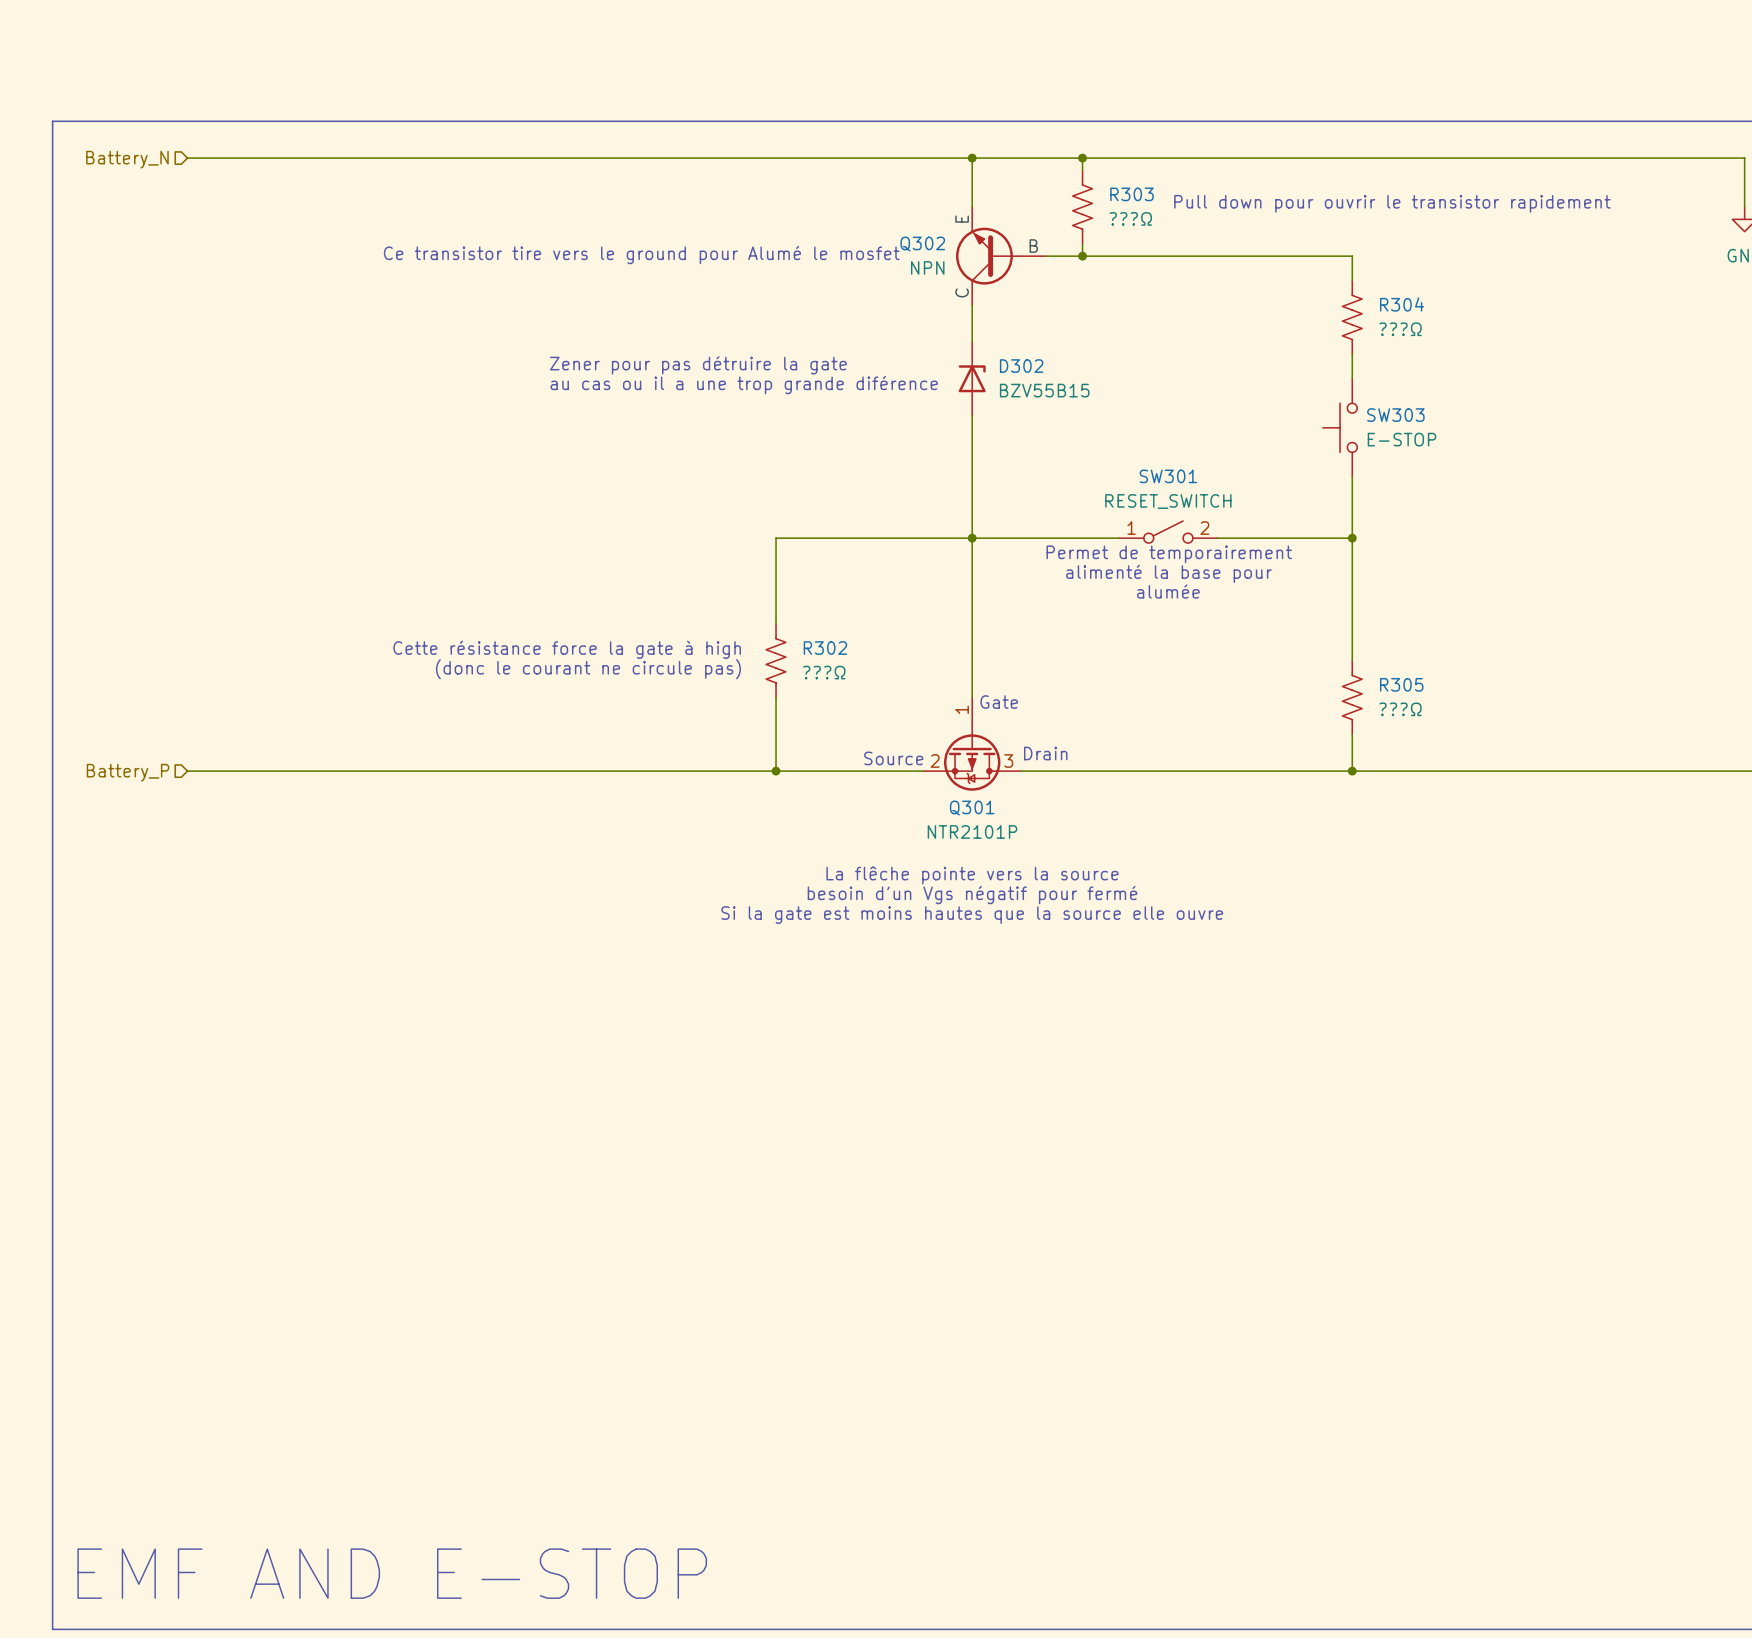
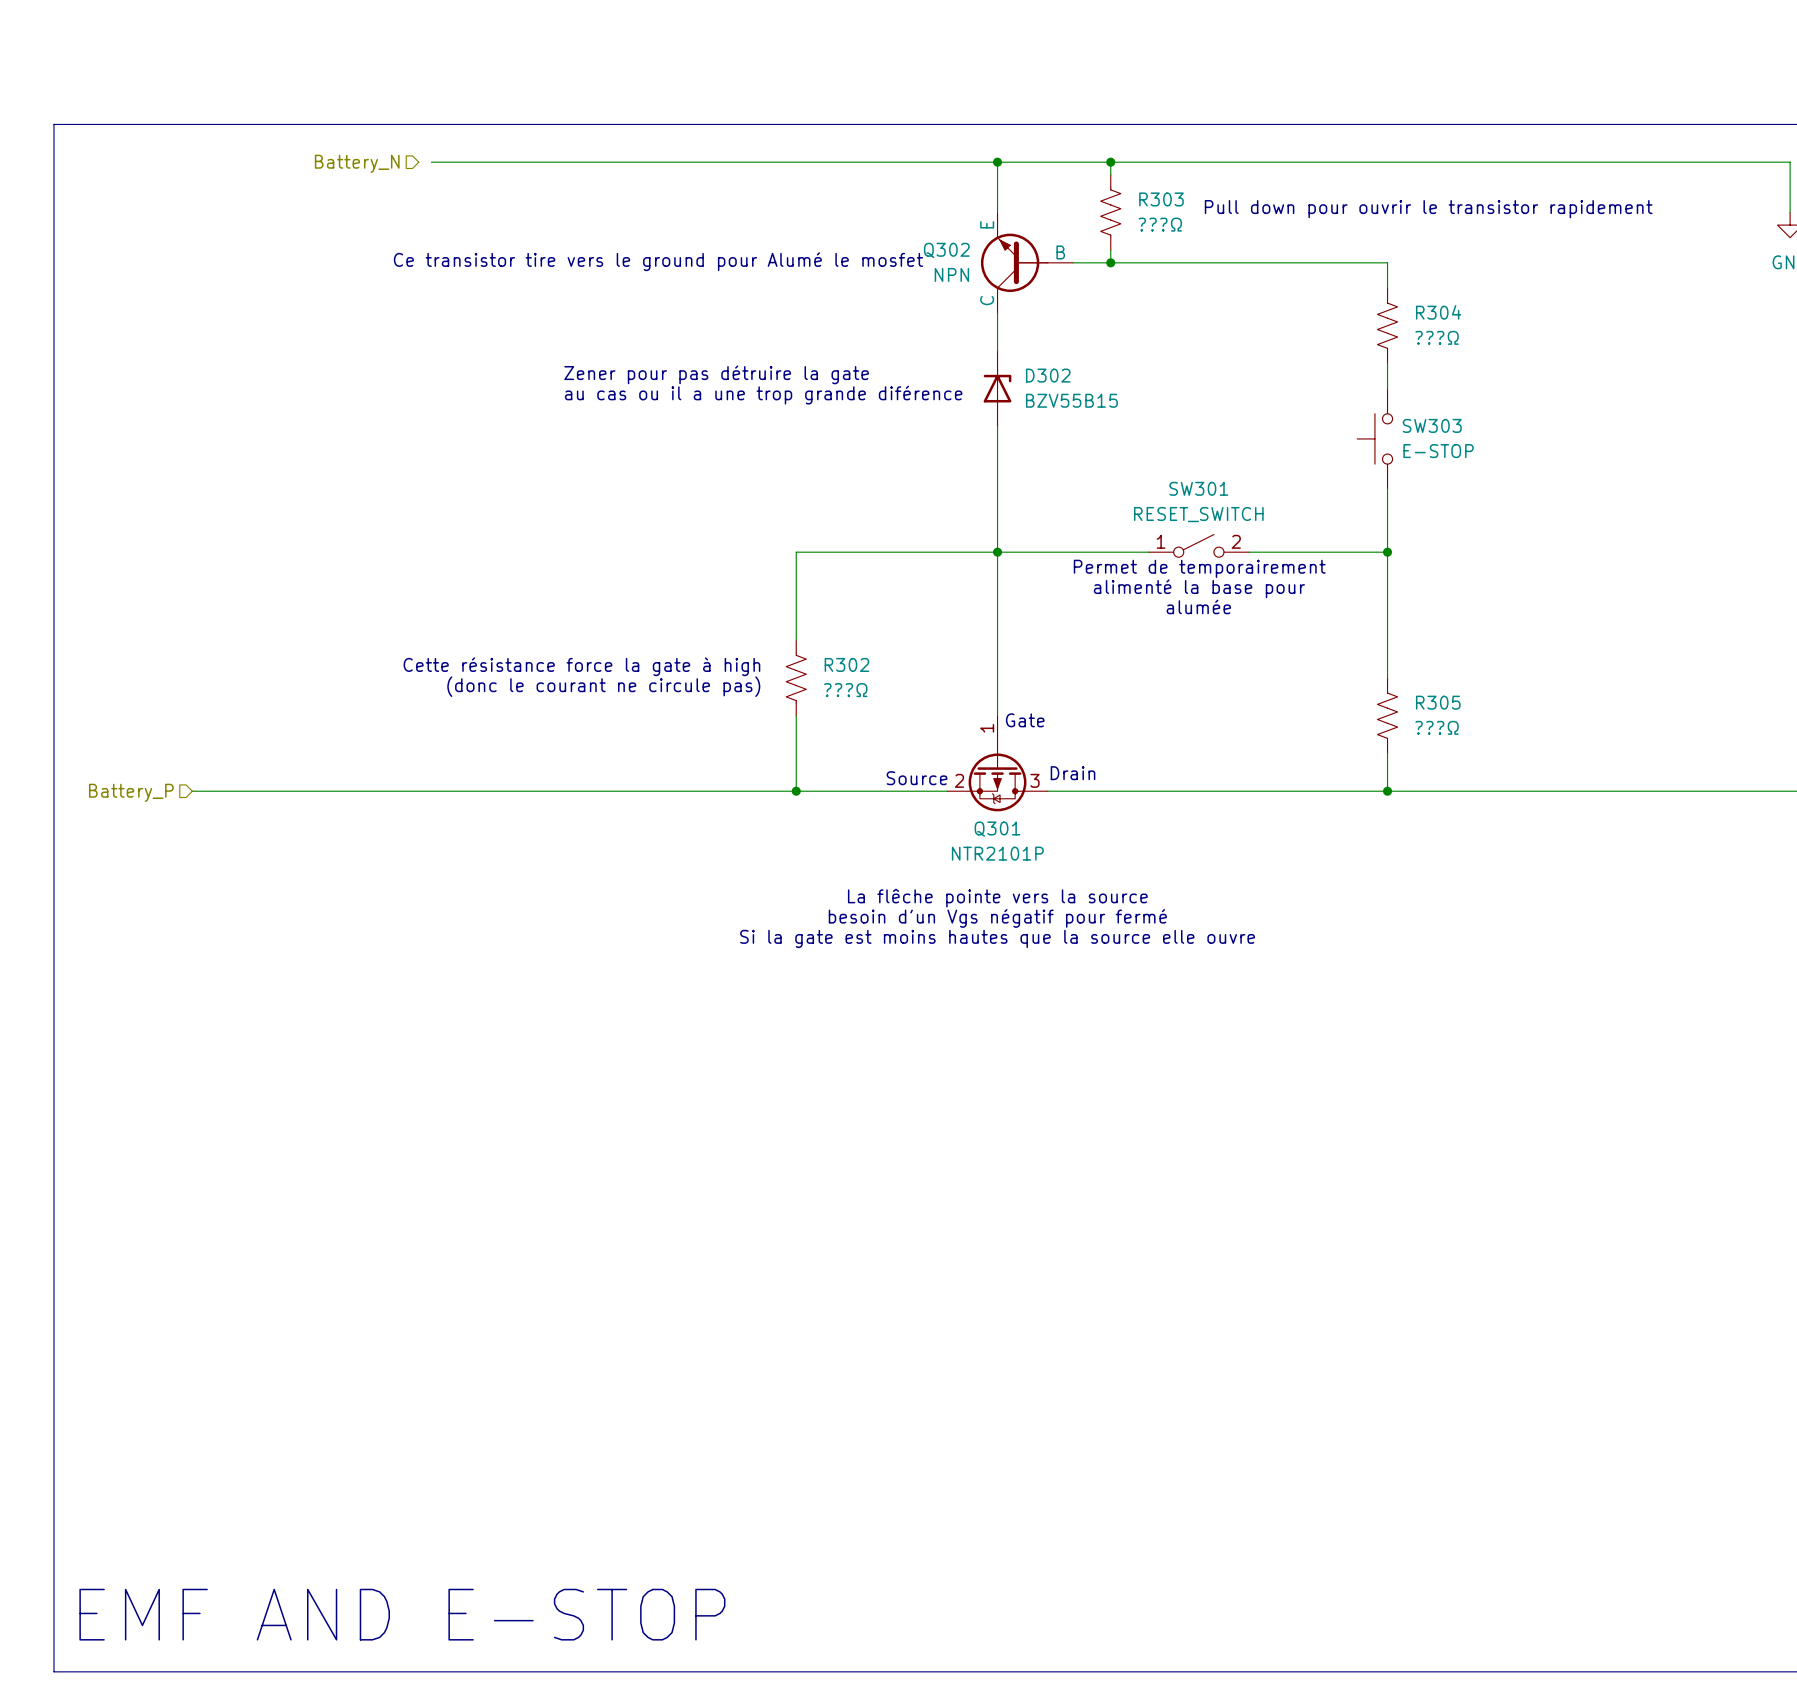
wire: (187, 158) (420, 158) -> none
hierarchical label position: Battery_N (127, 159) -> Battery_N (357, 163)

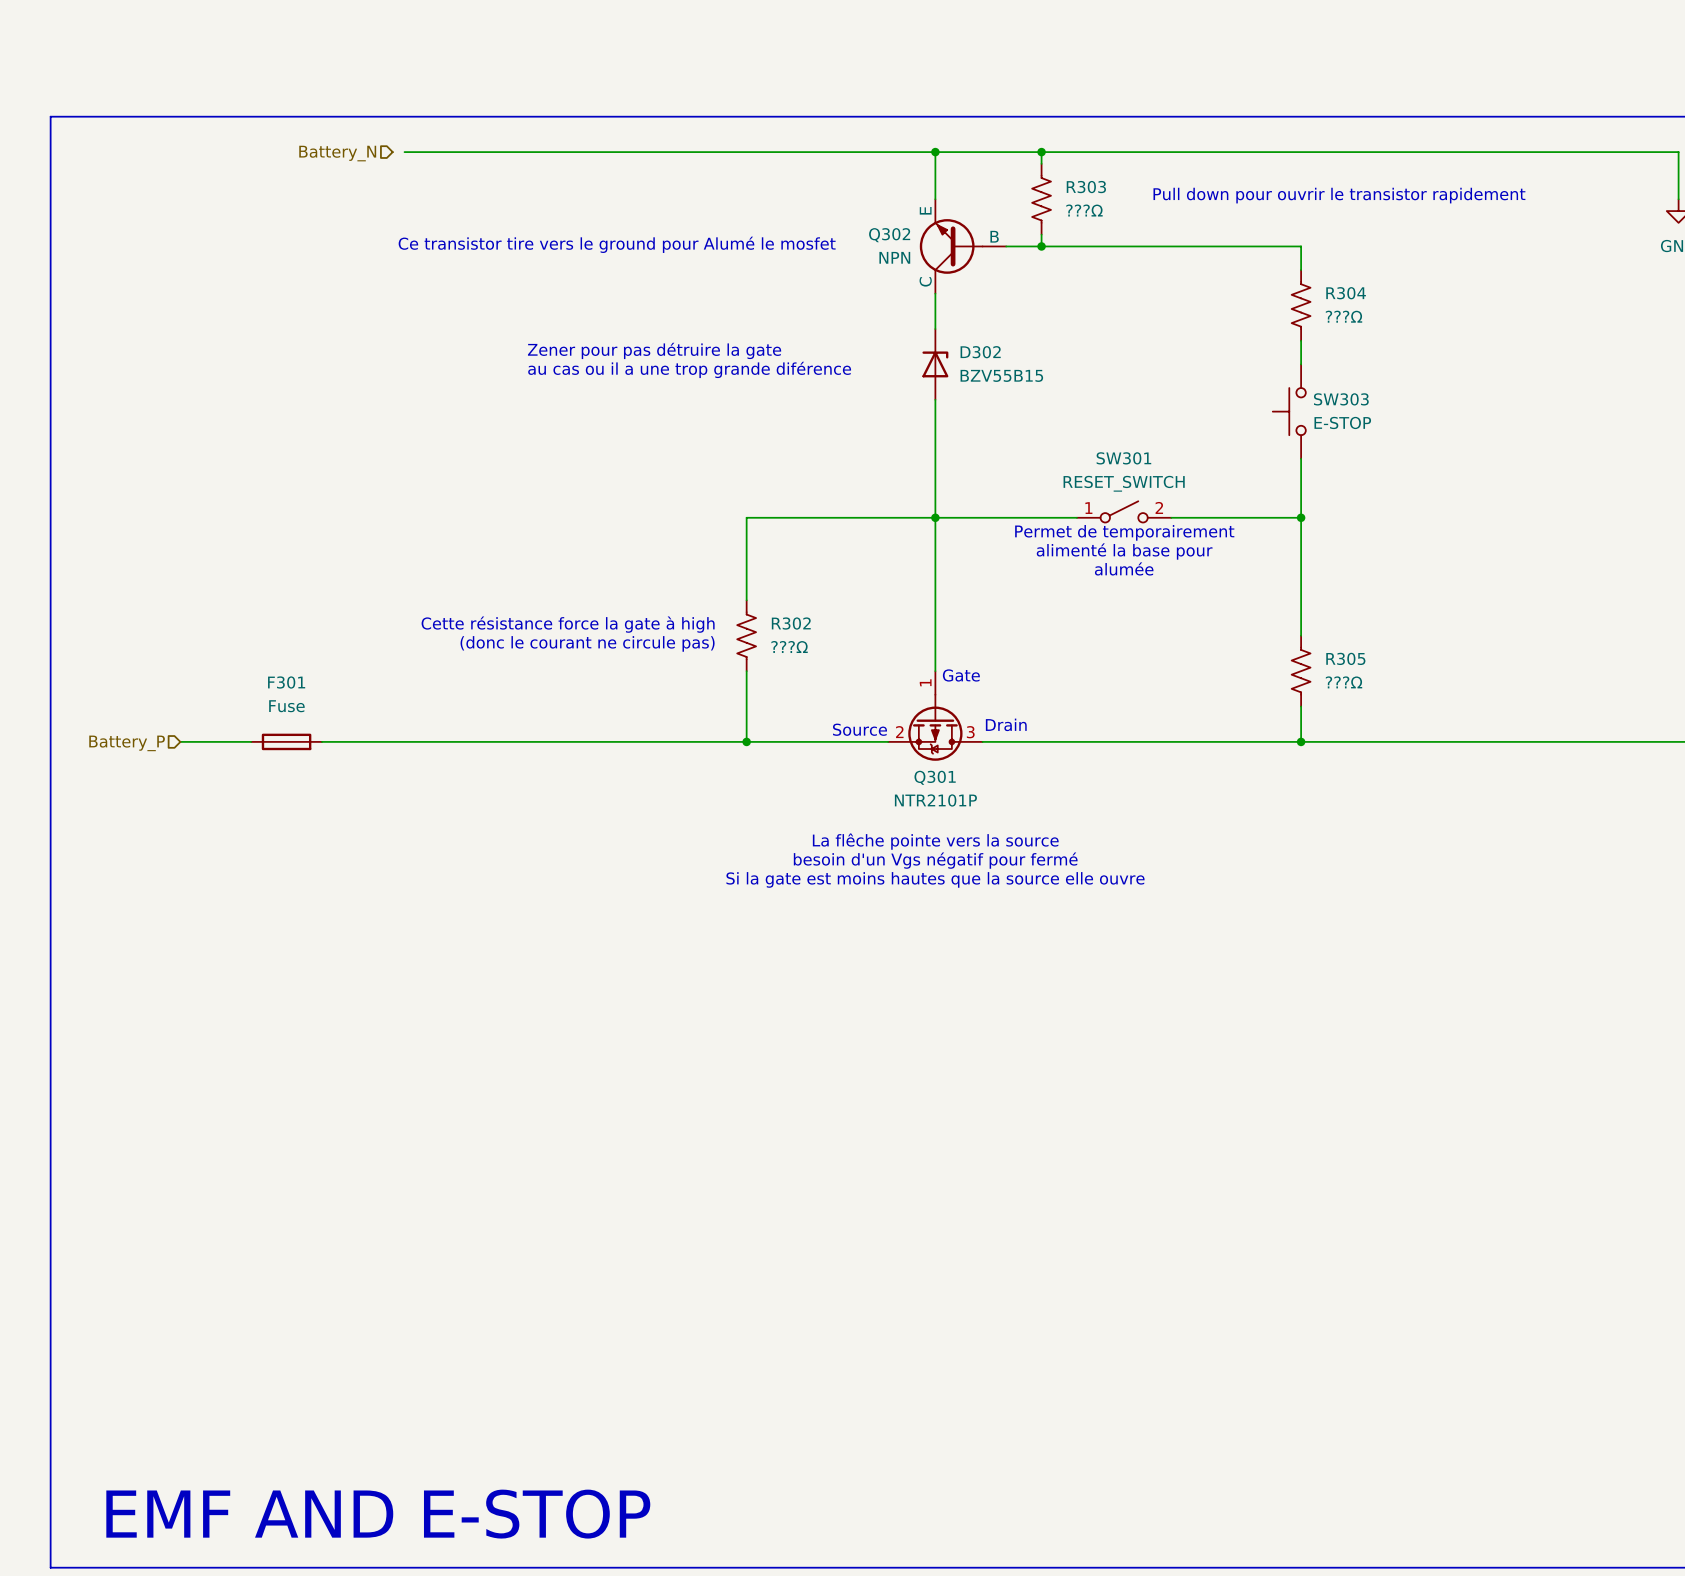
F301: none -> Fuse (286, 741)

